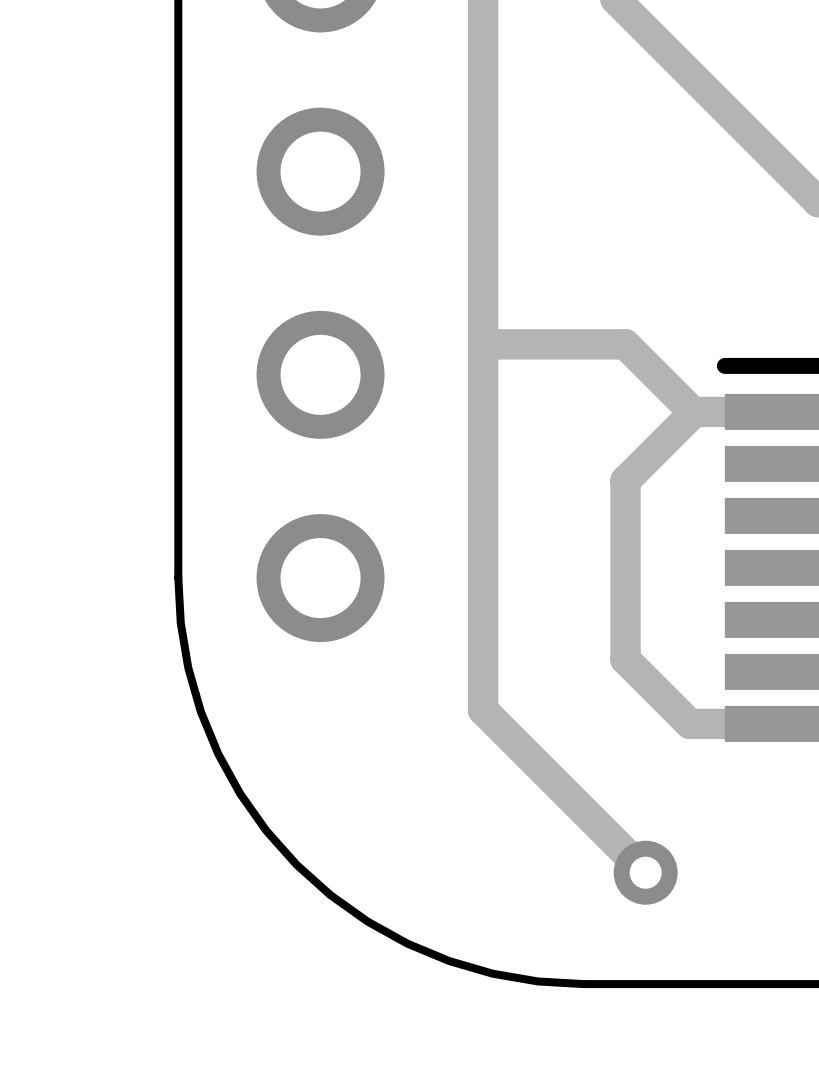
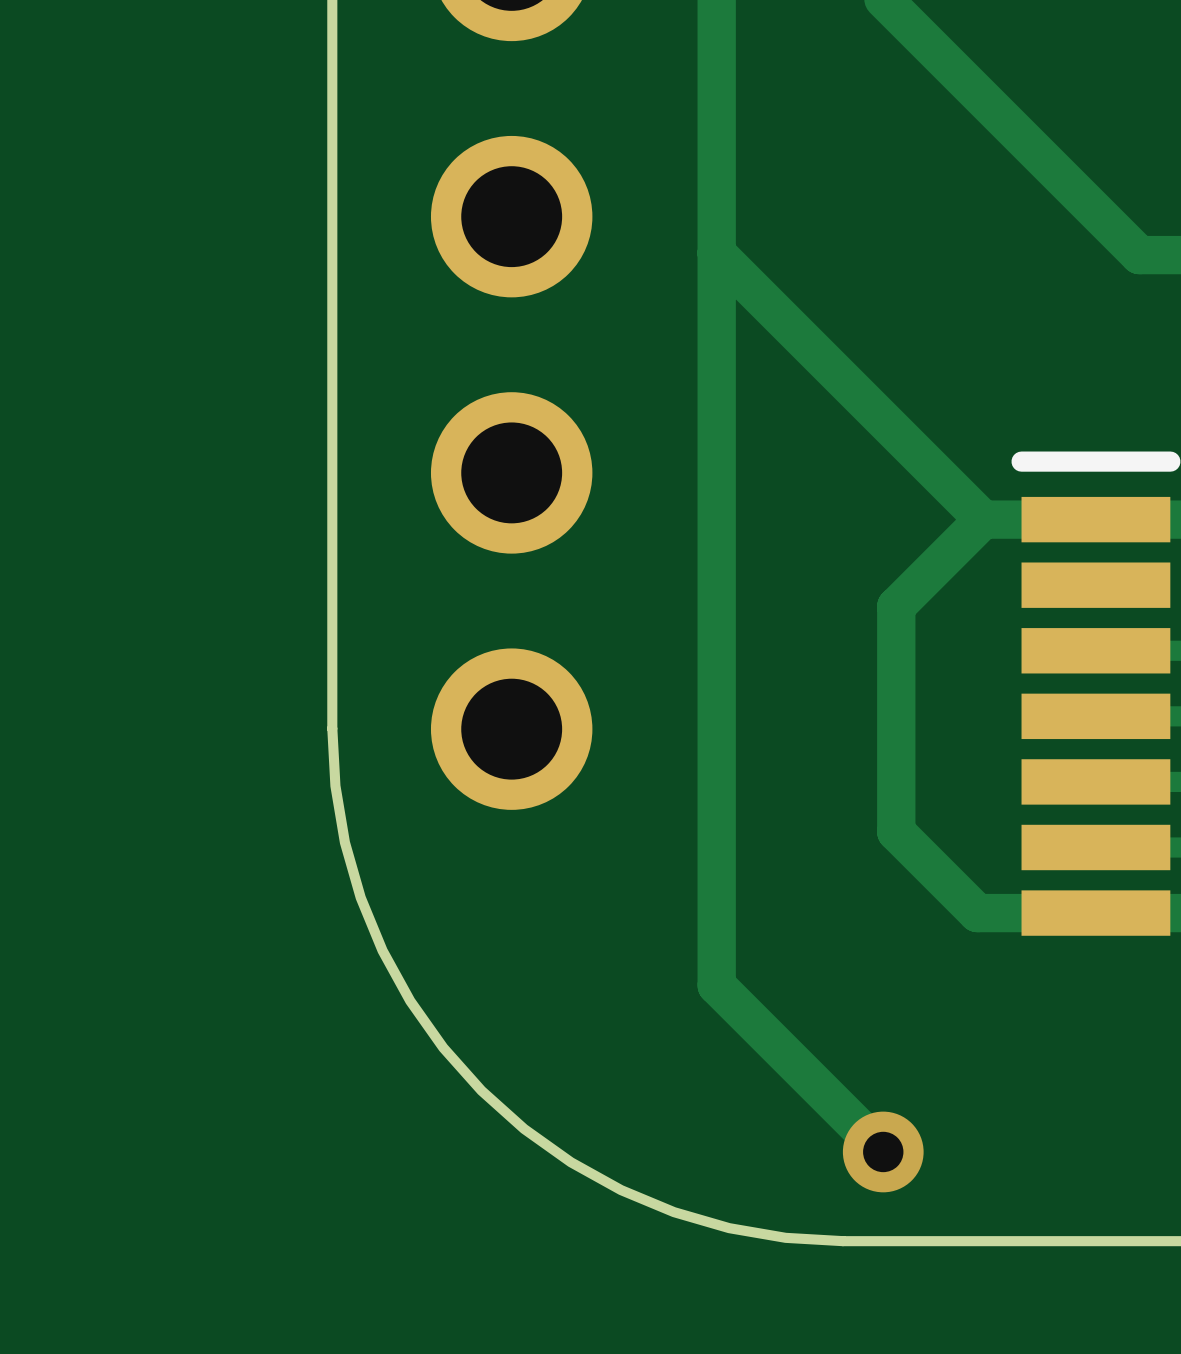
track: (483, 344) (625, 344) (692, 411) -> (716, 253) (983, 519)
track: (483, 710) (645, 872) -> (716, 895) (716, 985) (883, 1151)
via position: (645, 872) -> (883, 1151)

